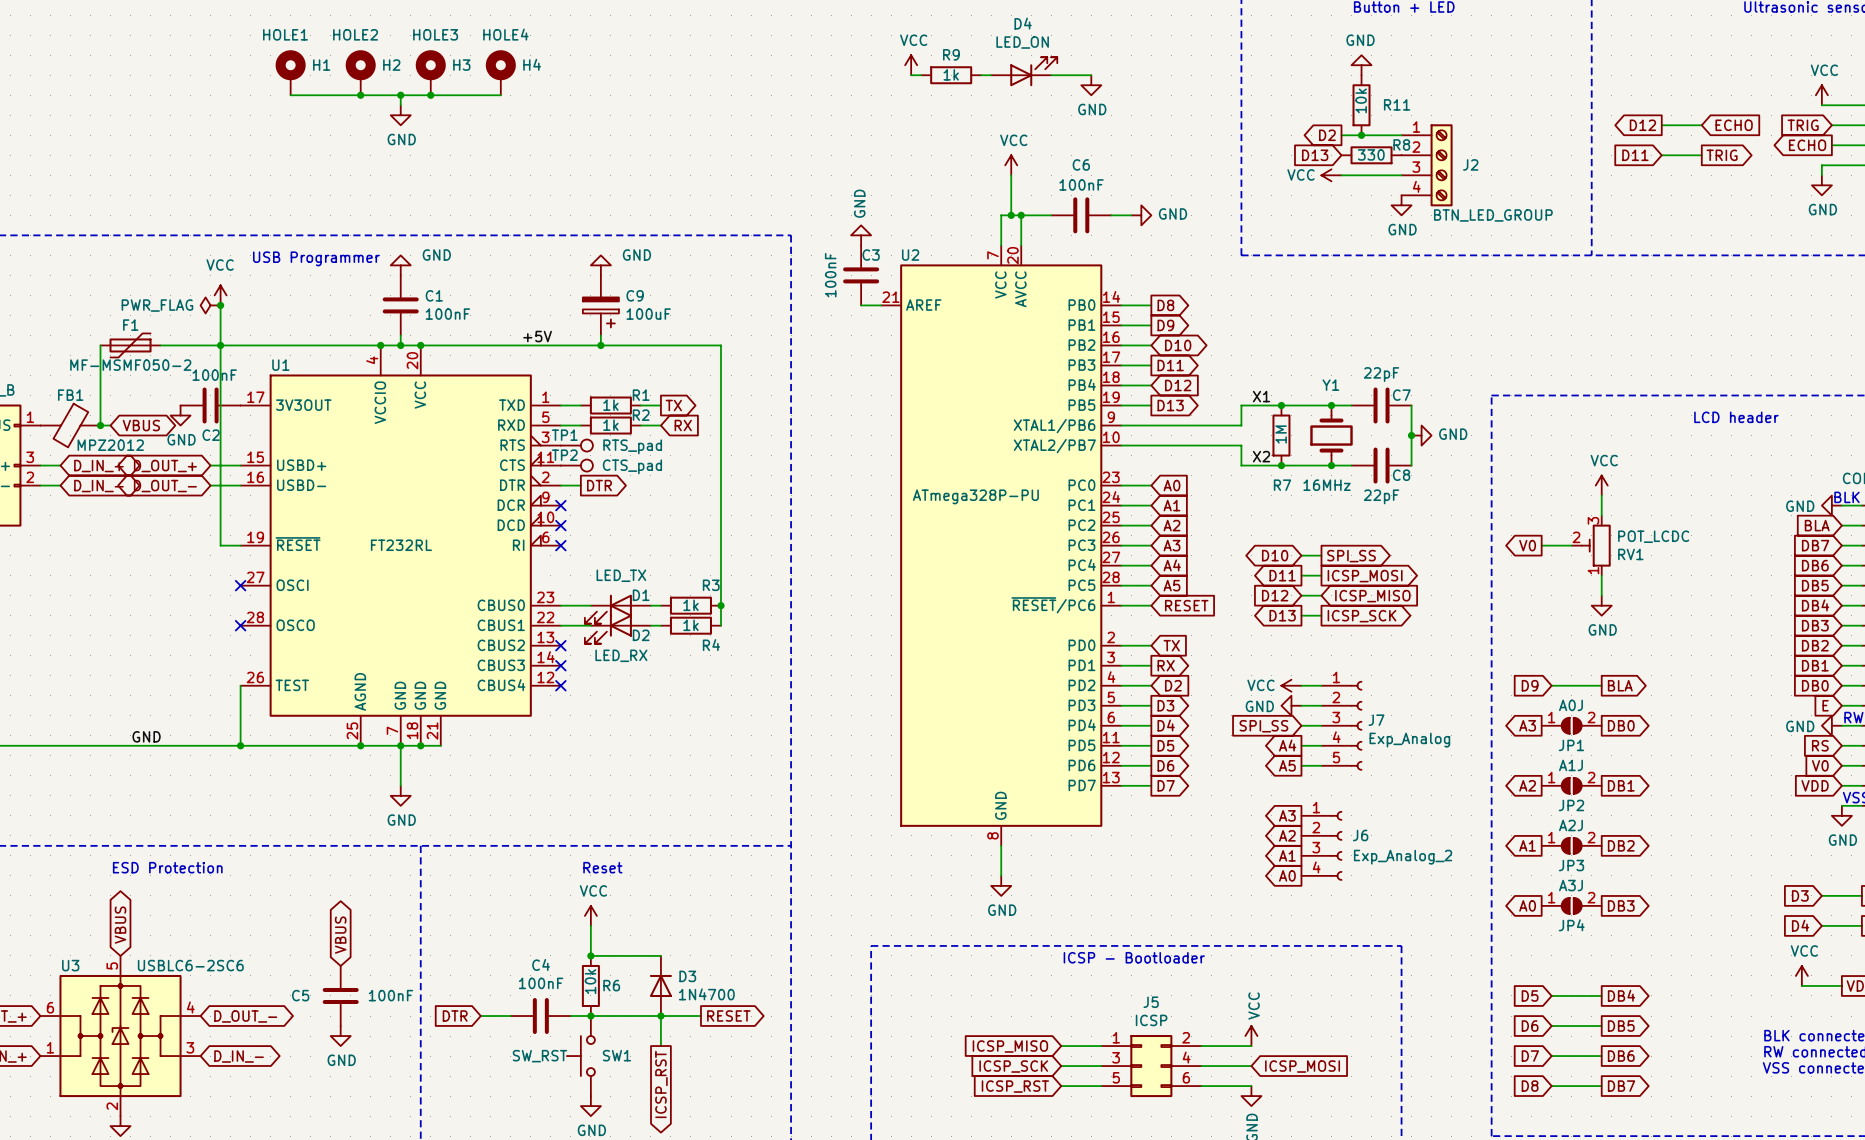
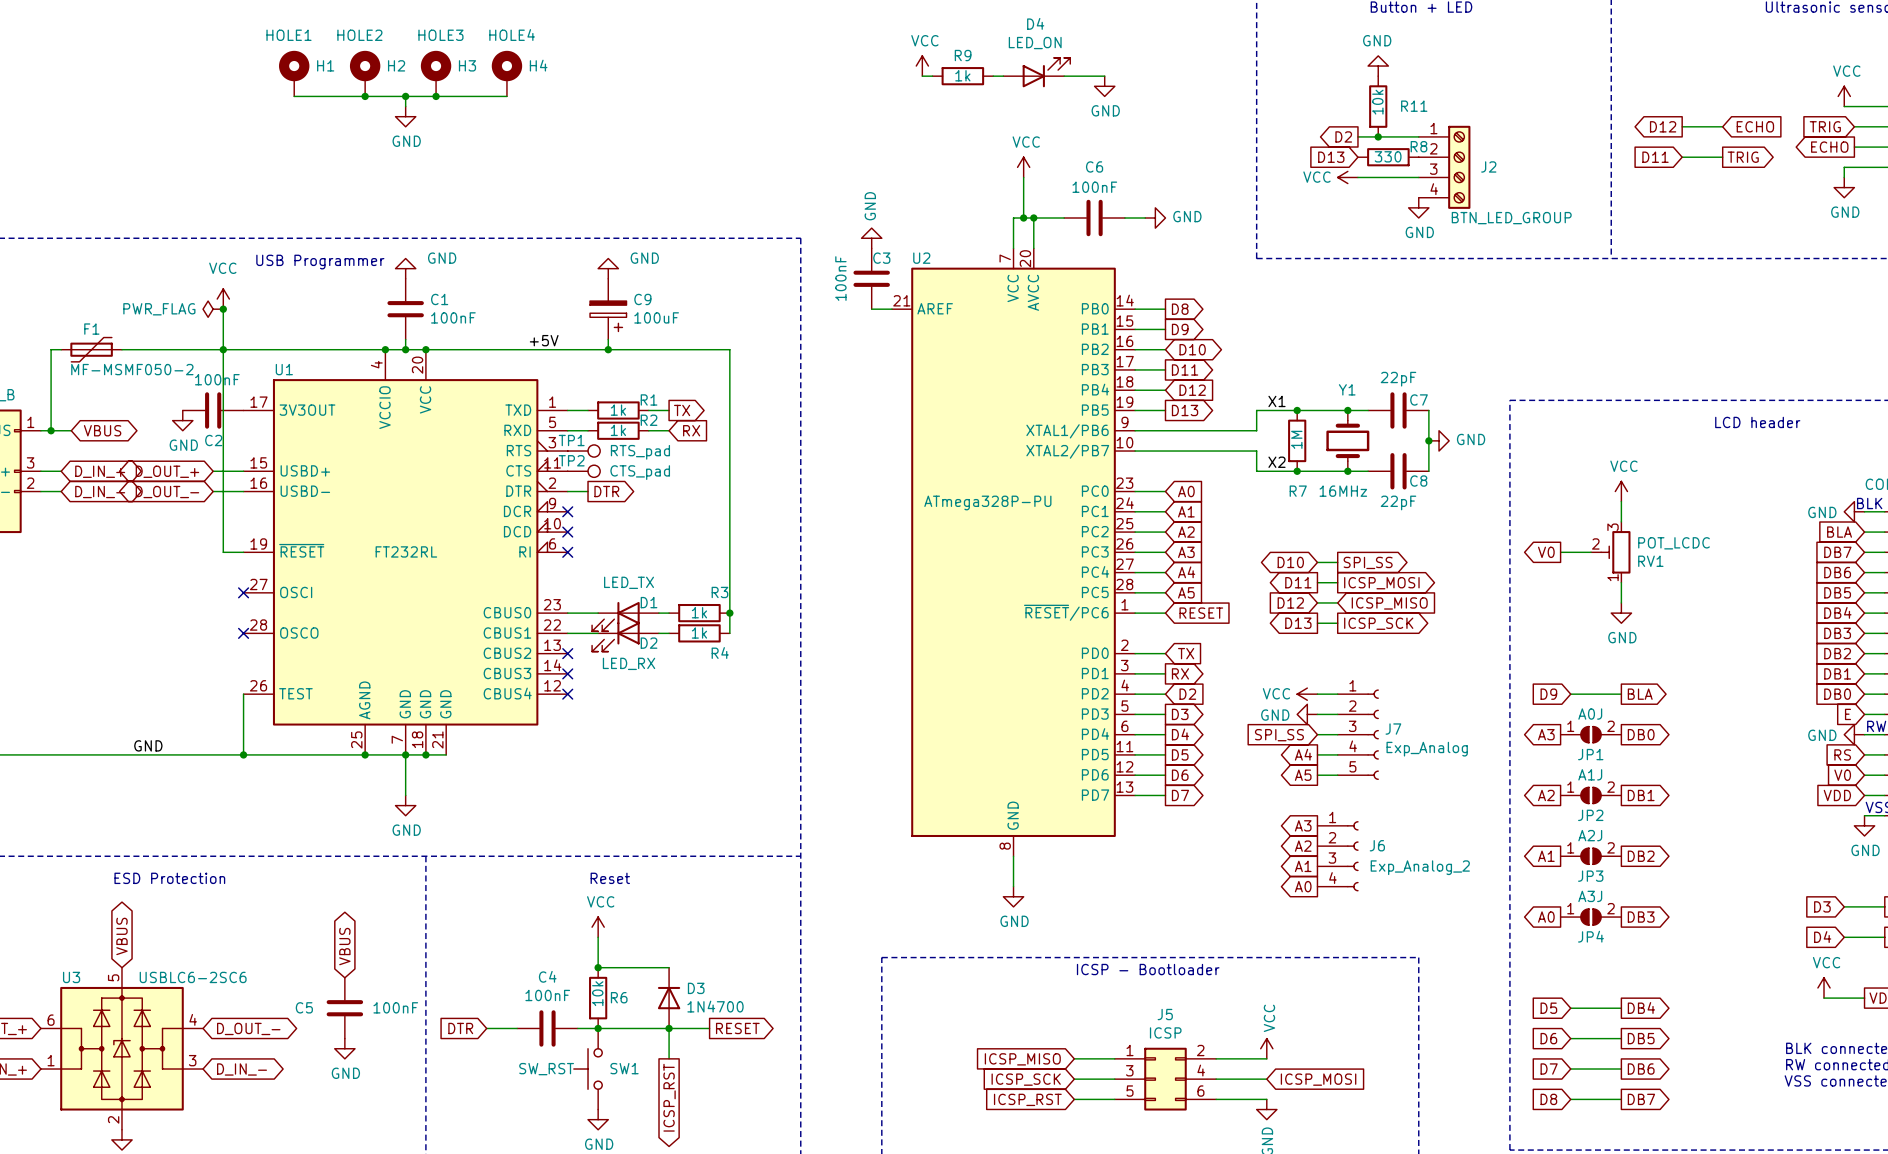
wire: none -> (61, 349) (51, 349) (51, 430)
wire: (100, 345) (100, 425) (110, 425) -> none
F1 position: (130, 345) -> (91, 349)
junction: none -> (51, 430)
FB1: MPZ2012 (70, 425) -> none
junction: (100, 425) -> none
global label position: VBUS (141, 425) -> VBUS (102, 430)

